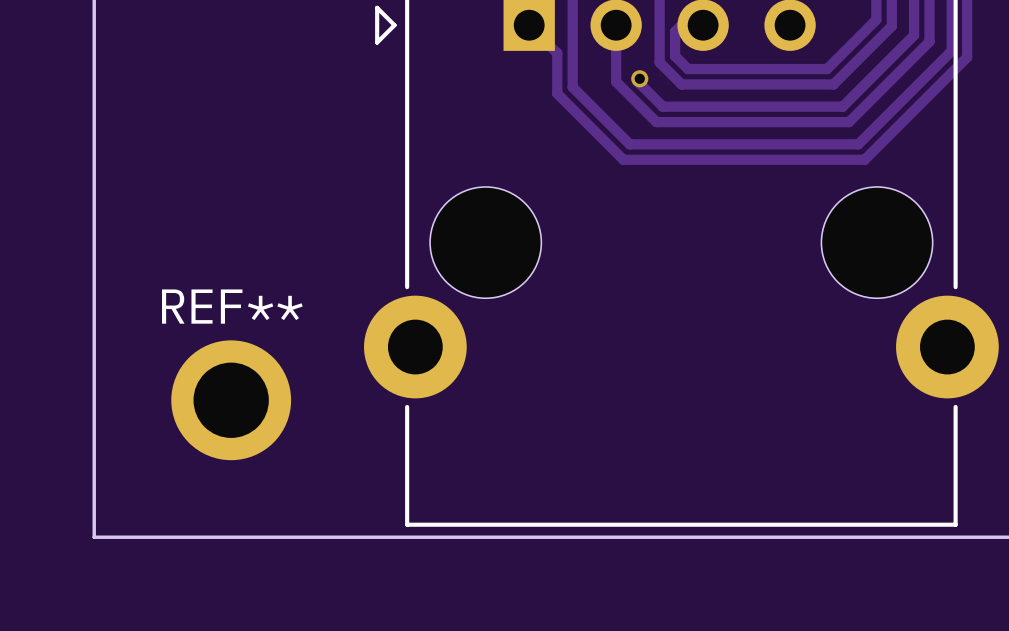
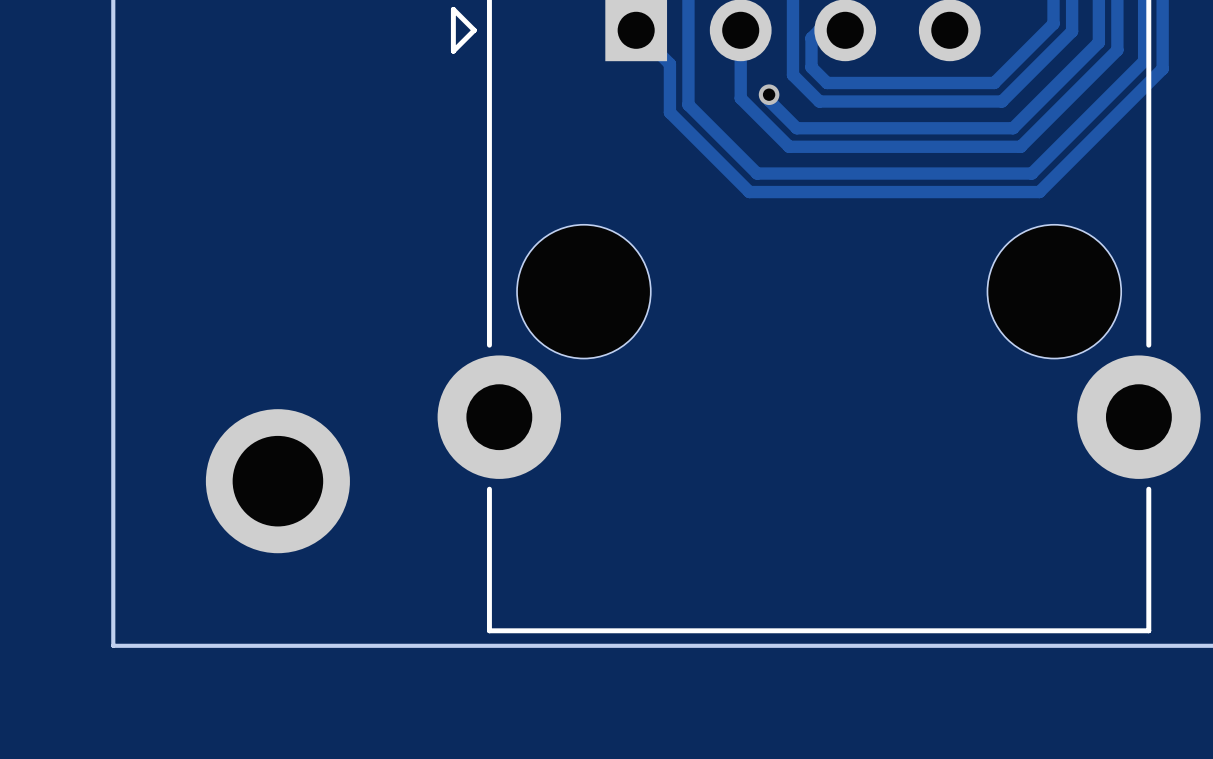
REF** name: REF** (232, 306) -> none

